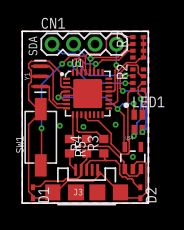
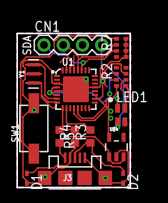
top track: (111, 34) (106, 40) (106, 48) (101, 53) (69, 56) (62, 63) -> (96, 36) (59, 36) (54, 41) (54, 52) (49, 56) (26, 56) (20, 62) (20, 140) (33, 153)
top track: none -> (63, 44) (66, 45) (78, 56)
bottom track: (73, 44) (87, 58) (90, 58) -> none
via: (90, 58) -> none
bottom track: (62, 63) (41, 84) (41, 128) -> none
via: (62, 63) -> none
bottom track: (69, 63) (89, 83) (125, 83) -> none
via: (69, 63) -> none
bottom track: (77, 63) (89, 75) (125, 75) -> none
via: (77, 63) -> none
via: (116, 65) -> none
bottom track: none -> (109, 68) (123, 82) (123, 94)
via: (125, 75) -> none
bottom track: none -> (109, 75) (109, 93)
via: none -> (85, 79)
via: (125, 83) -> none
via: none -> (102, 81)
top track: (132, 89) (127, 93) (127, 154) (121, 154) (111, 143) (111, 133) (98, 120) (87, 120) (85, 114) -> (116, 85) (116, 93) (108, 101) (108, 106) (94, 120) (80, 120) (74, 113) (74, 108)
bottom track: (122, 90) (143, 90) (145, 93) (145, 129) (142, 131) -> none
via: (122, 90) -> none
top track: none -> (109, 93) (106, 105) (93, 118) (81, 118) (77, 113) (77, 108)
via: none -> (109, 93)
via: (140, 98) -> none
top track: none -> (41, 95) (51, 107) (56, 105) (56, 102)
via: (117, 109) -> none
via: none -> (34, 110)
via: none -> (110, 111)
via: (115, 124) -> none
via: (59, 125) -> none
via: none -> (110, 118)
via: (83, 126) -> none
top track: (41, 128) (41, 167) (40, 165) -> none
via: (41, 128) -> none
via: (142, 131) -> none
top track: (104, 154) (105, 160) -> (91, 143) (92, 152) (105, 165) (120, 166) (123, 170) (123, 173)
via: (132, 156) -> none
top track: (89, 161) (115, 160) (119, 164) (119, 174) (127, 178) (131, 178) (138, 187) (139, 186) -> (77, 150) (86, 142) (90, 142)
top track: (100, 173) (93, 181) (75, 181) -> none
via: none -> (45, 177)
via: none -> (105, 178)

